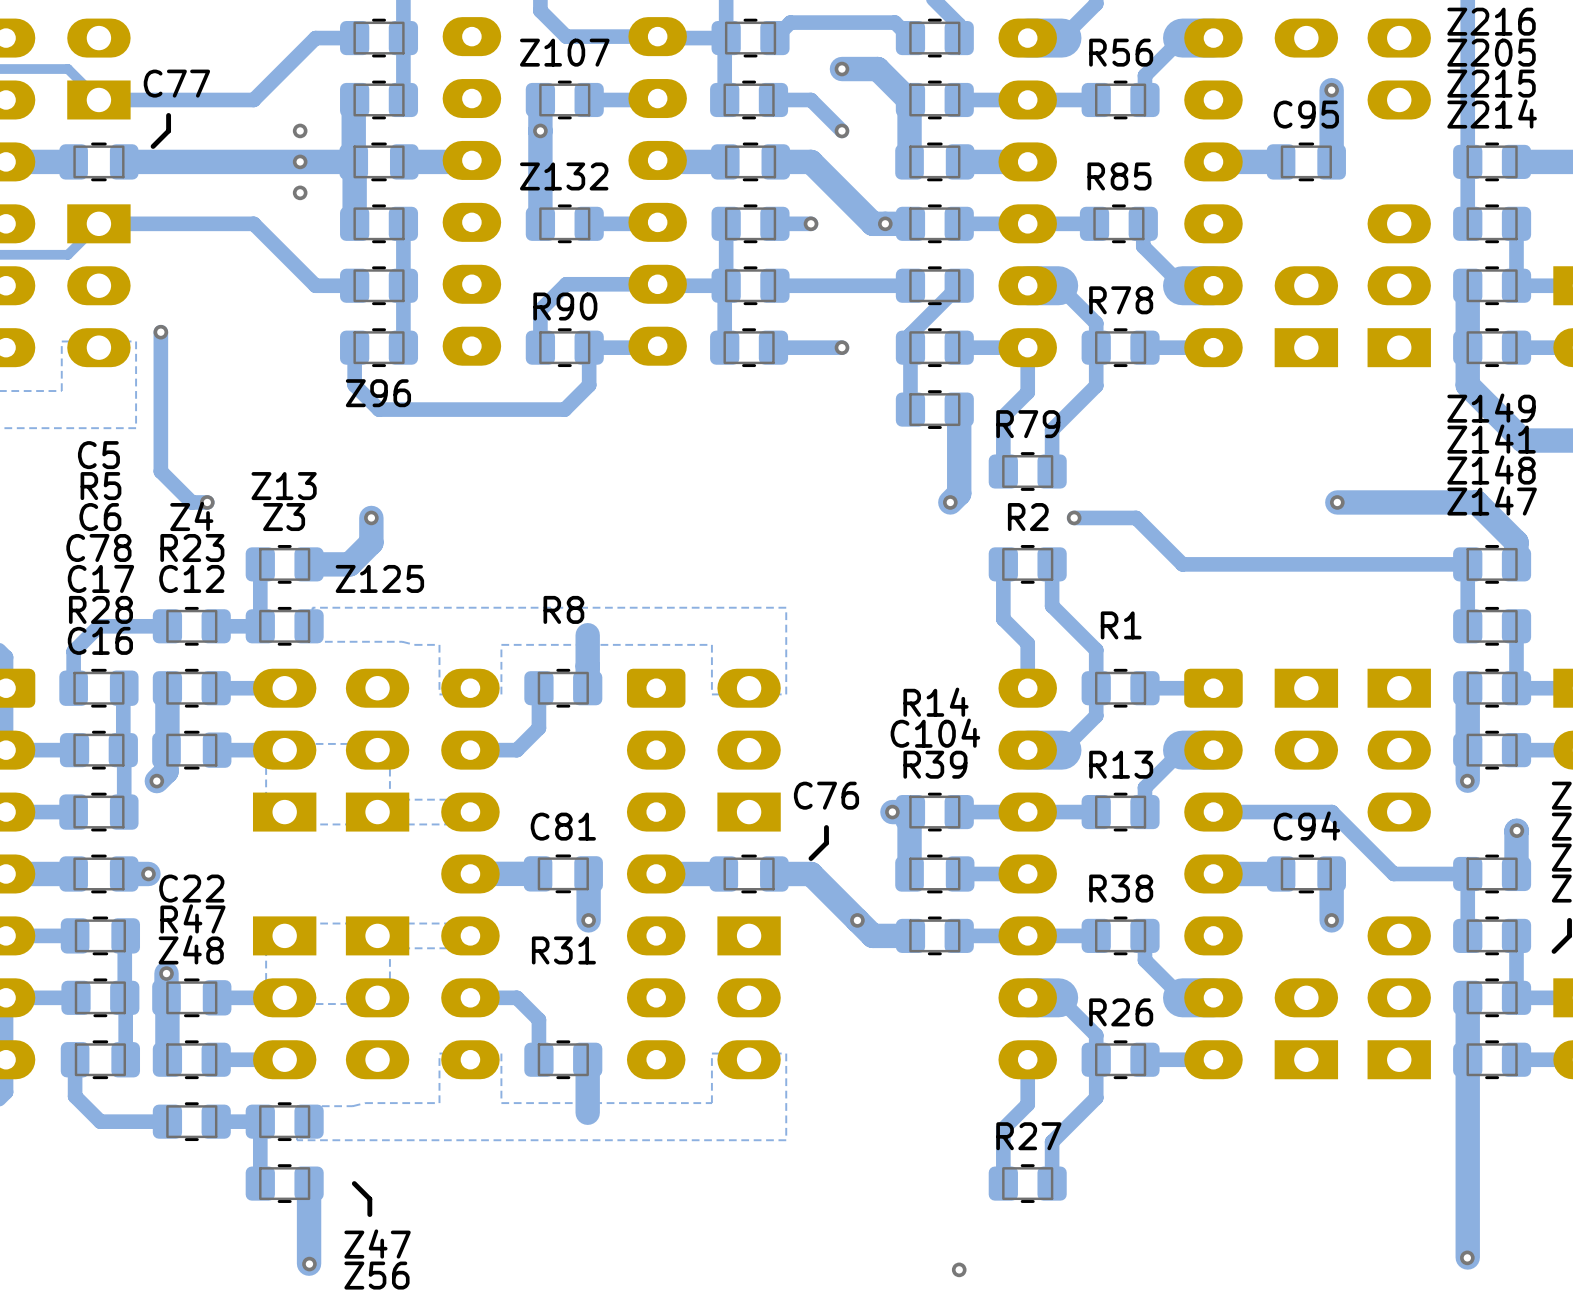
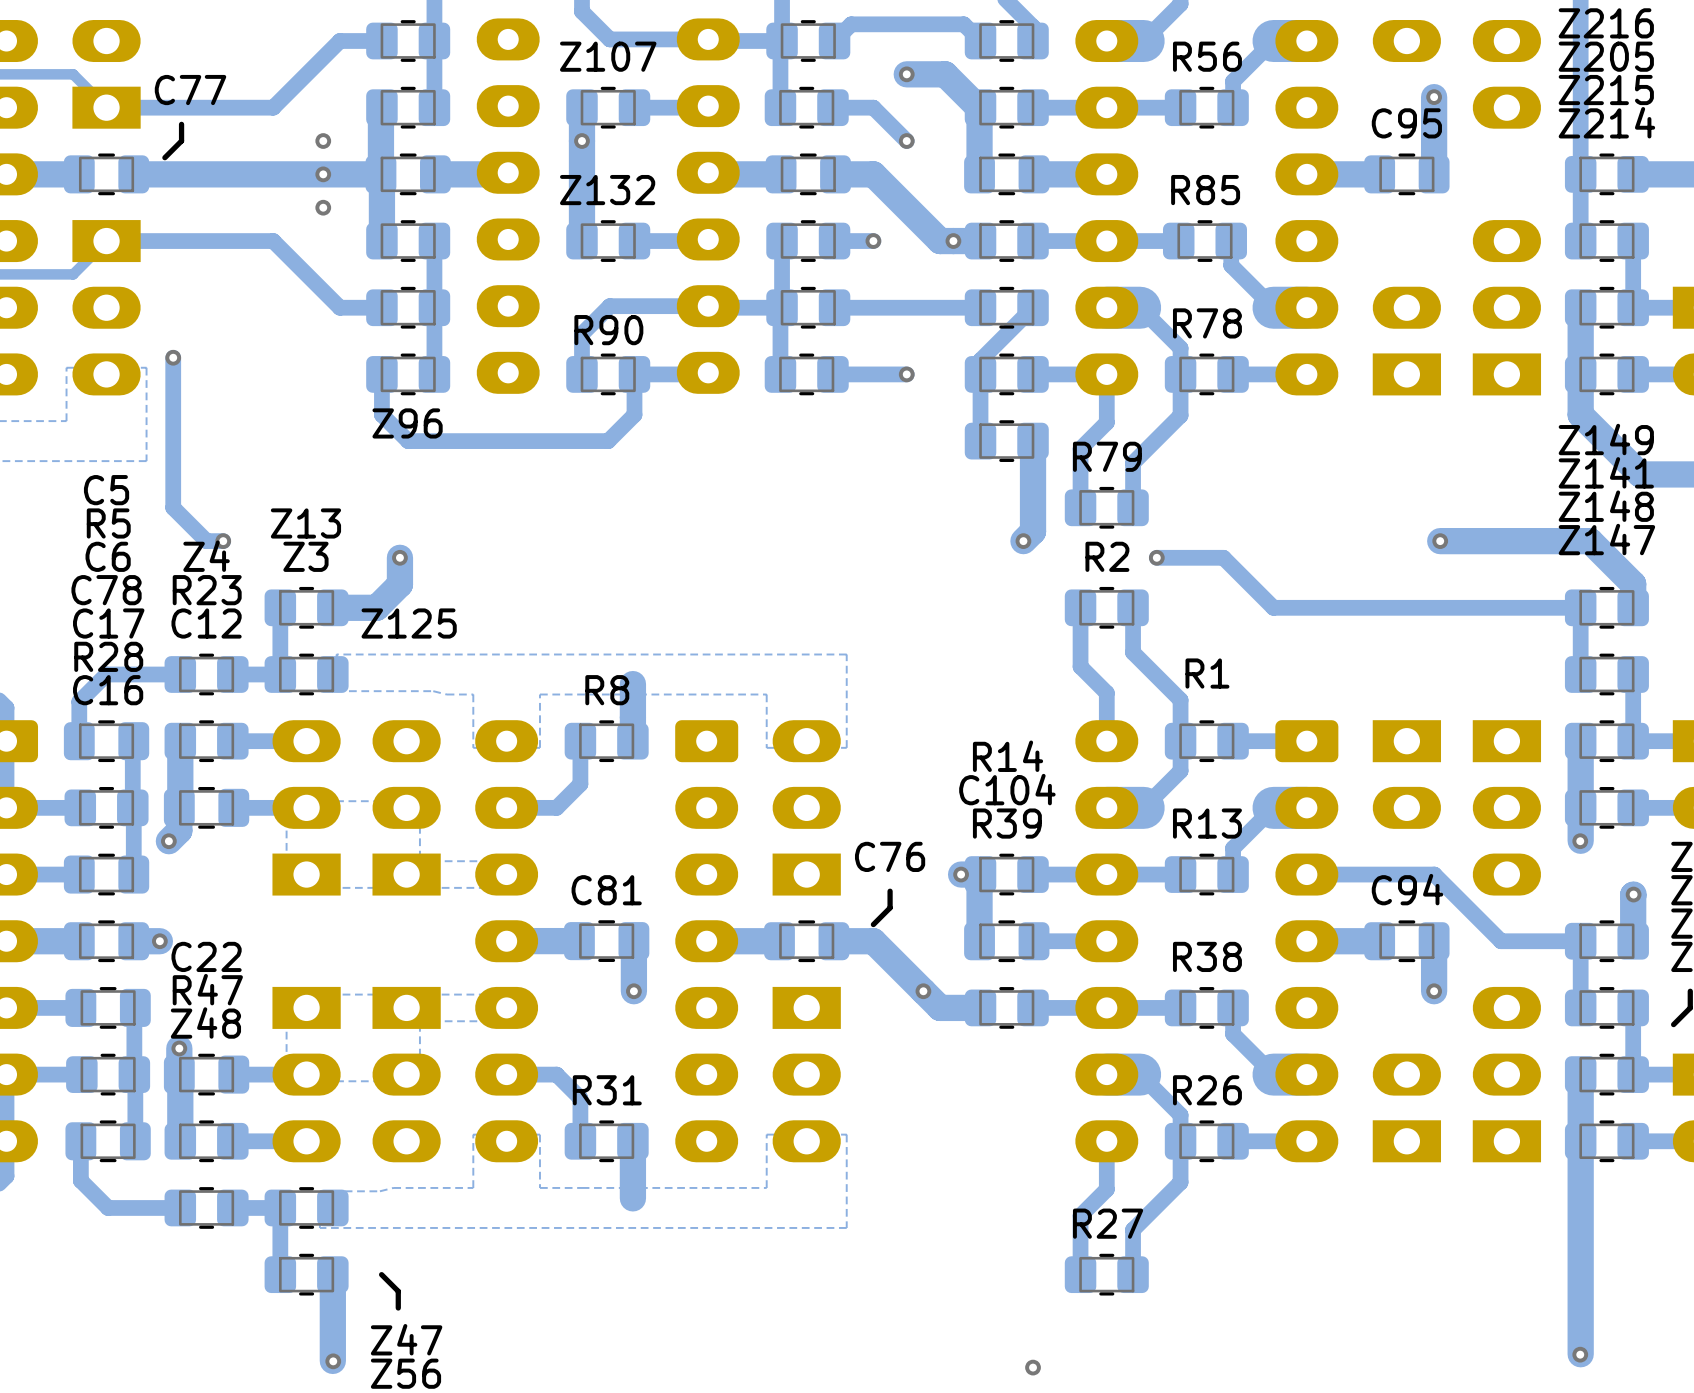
R8 name position: R8 (563, 609) -> R8 (607, 690)
R31 name position: R31 (563, 950) -> R31 (607, 1090)

